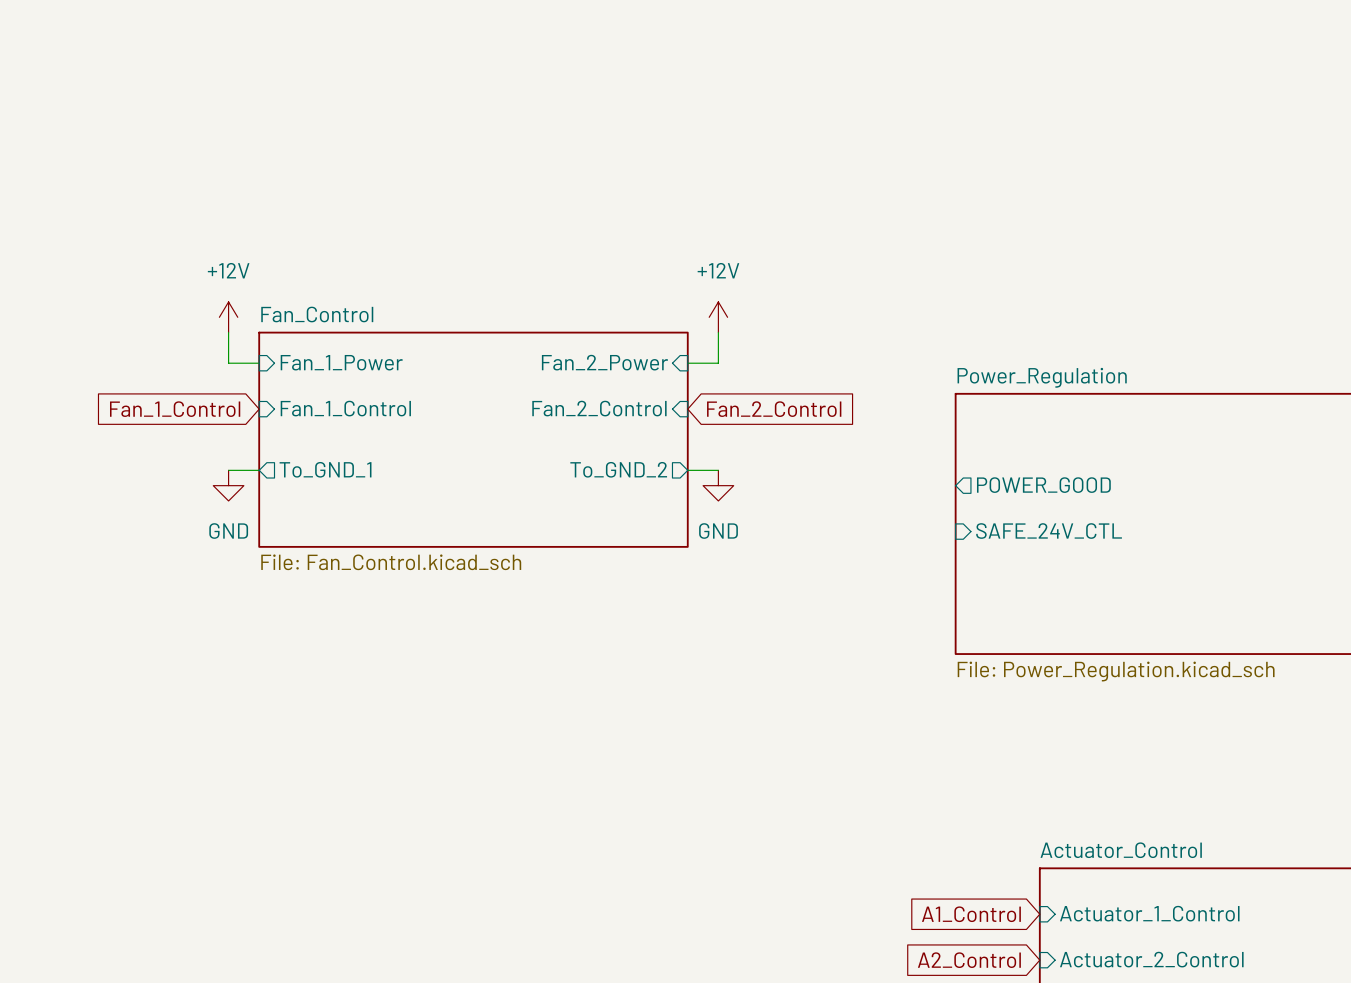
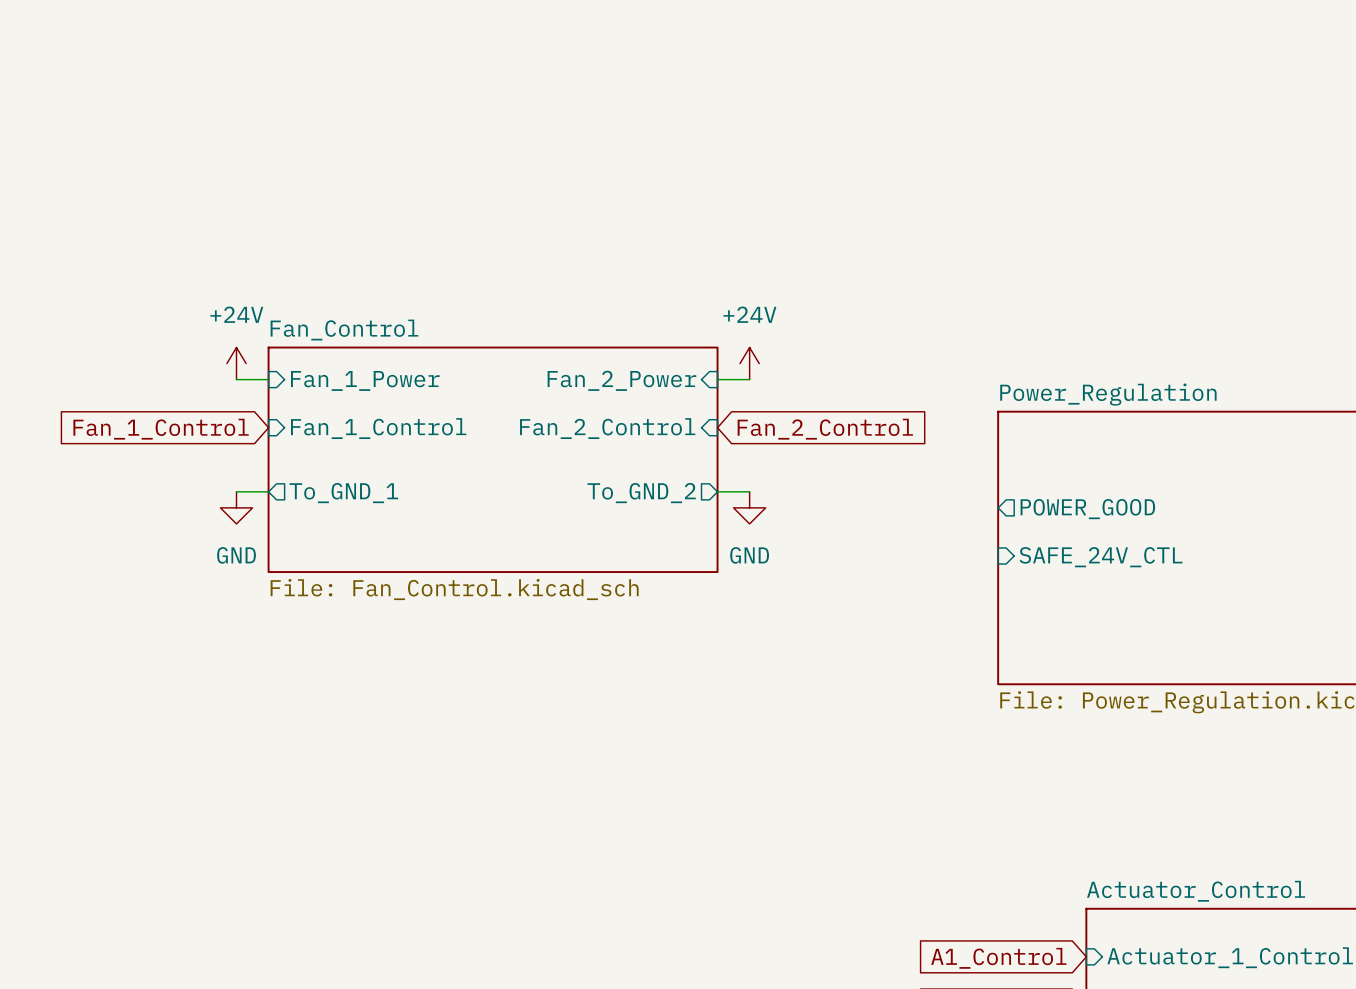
power symbol: +12V (228, 317) -> none
power symbol: +12V (718, 317) -> none
power symbol: none -> +24V (236, 363)
power symbol: none -> +24V (749, 363)

